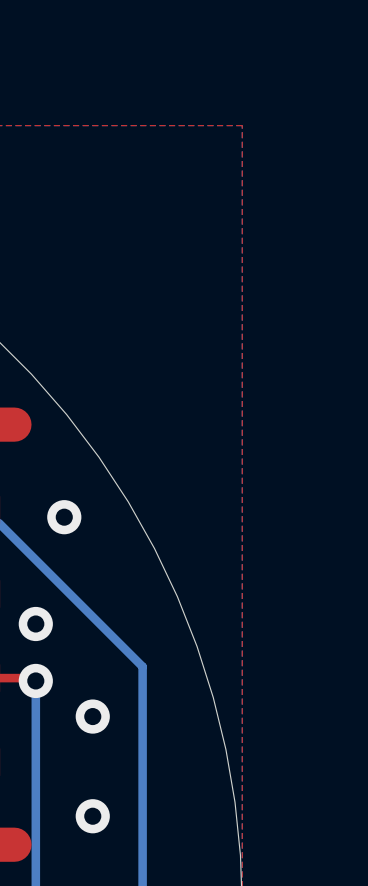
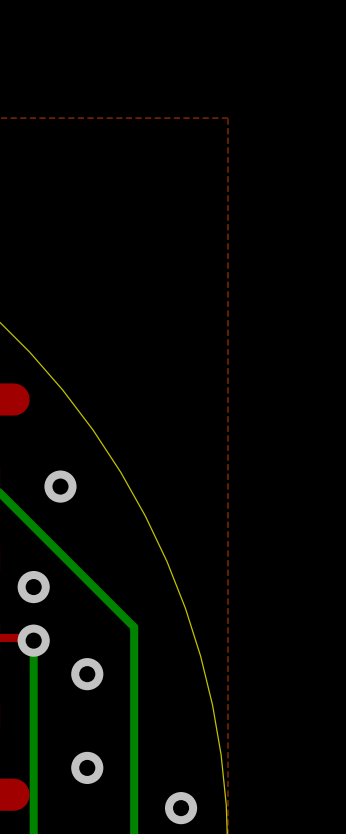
via: none -> (181, 808)

